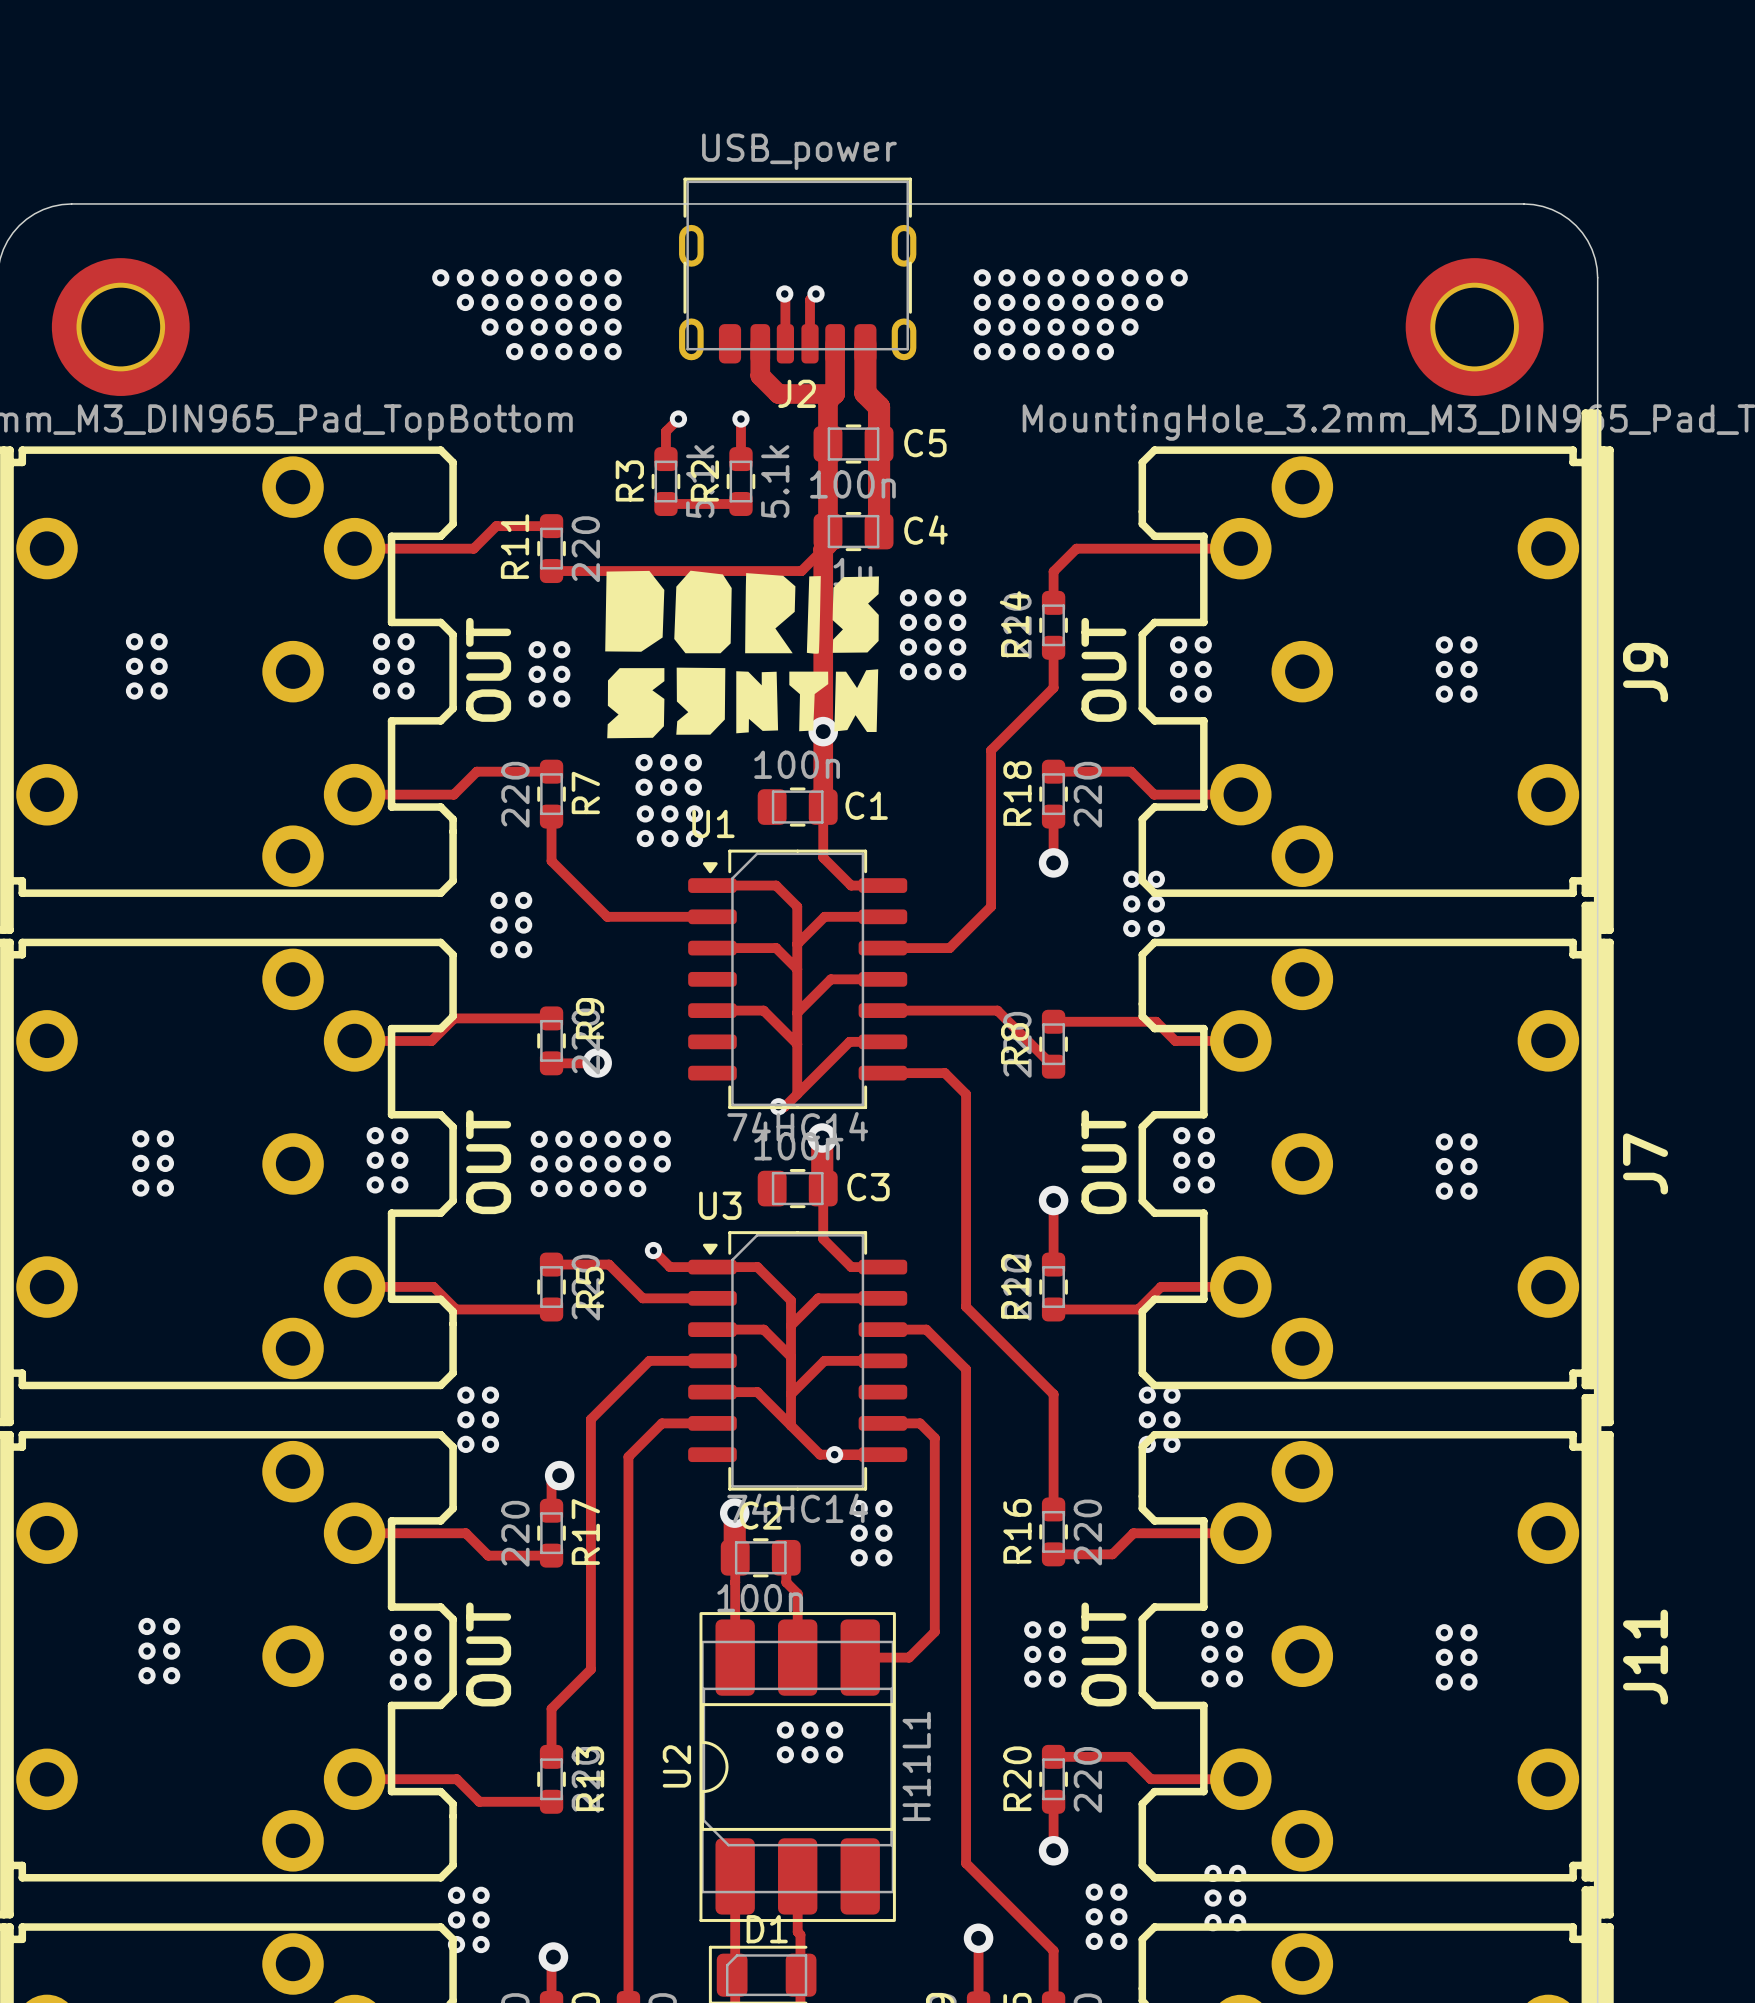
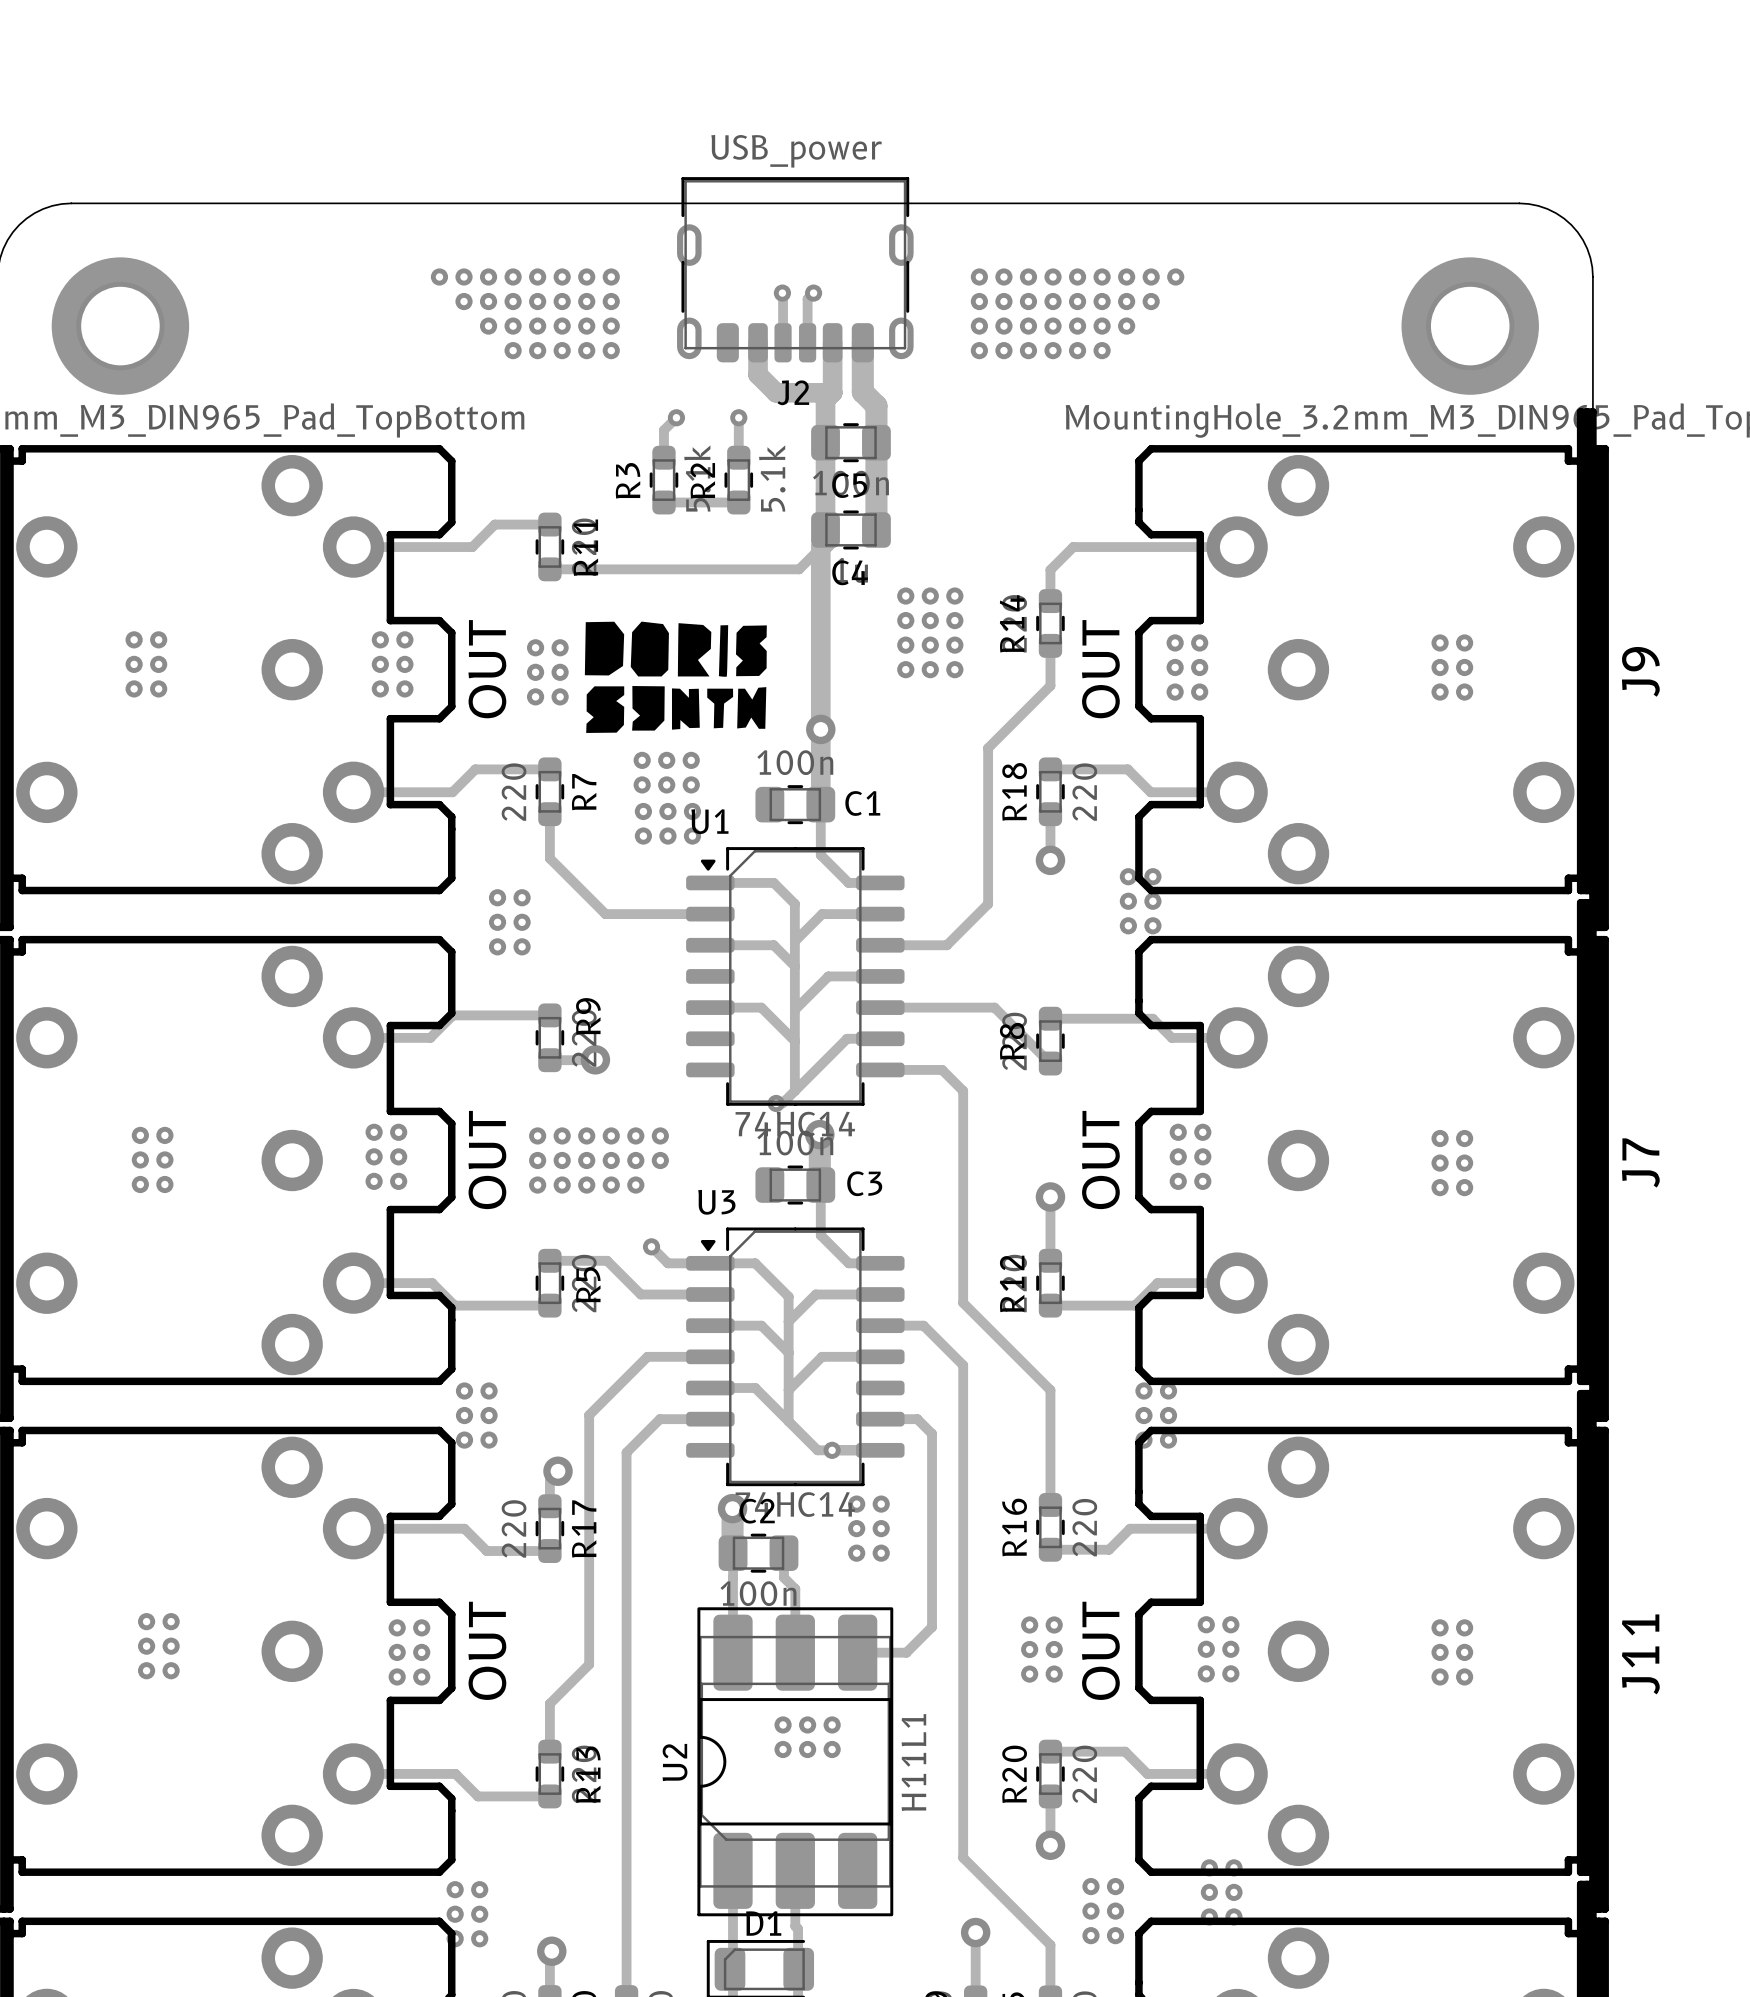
C5 name position: C5 (925, 443) -> C5 (849, 485)
C4 name position: C4 (926, 530) -> C4 (850, 572)
R11 name position: R11 (514, 546) -> R11 (585, 547)
drawing: [605, 570, 879, 739] -> none
drawing: none -> [584, 621, 767, 733]
drawing shape: [736, 671, 779, 734] -> [737, 687, 767, 729]

